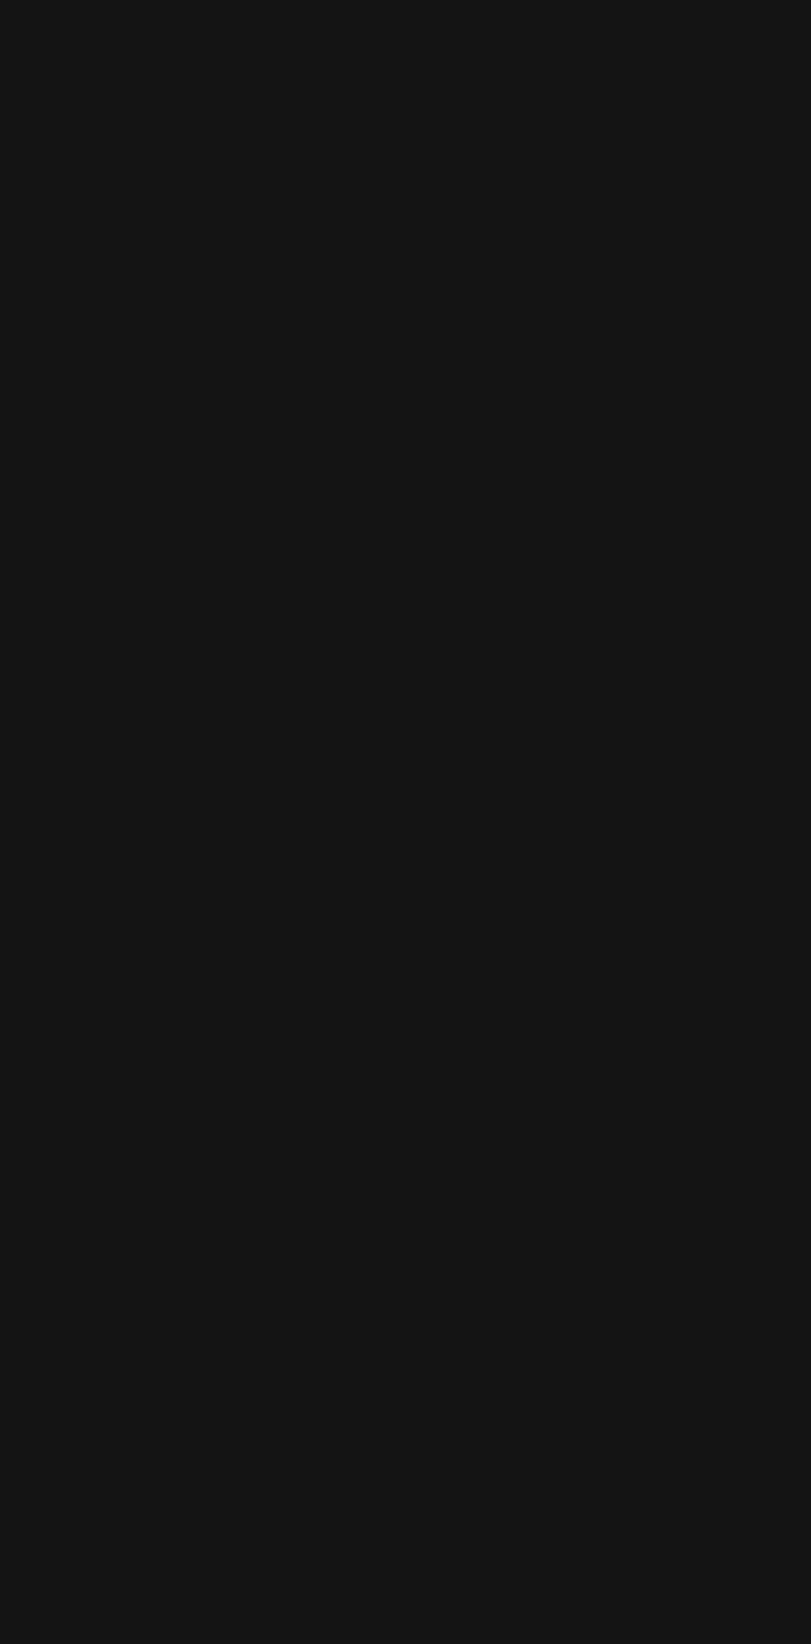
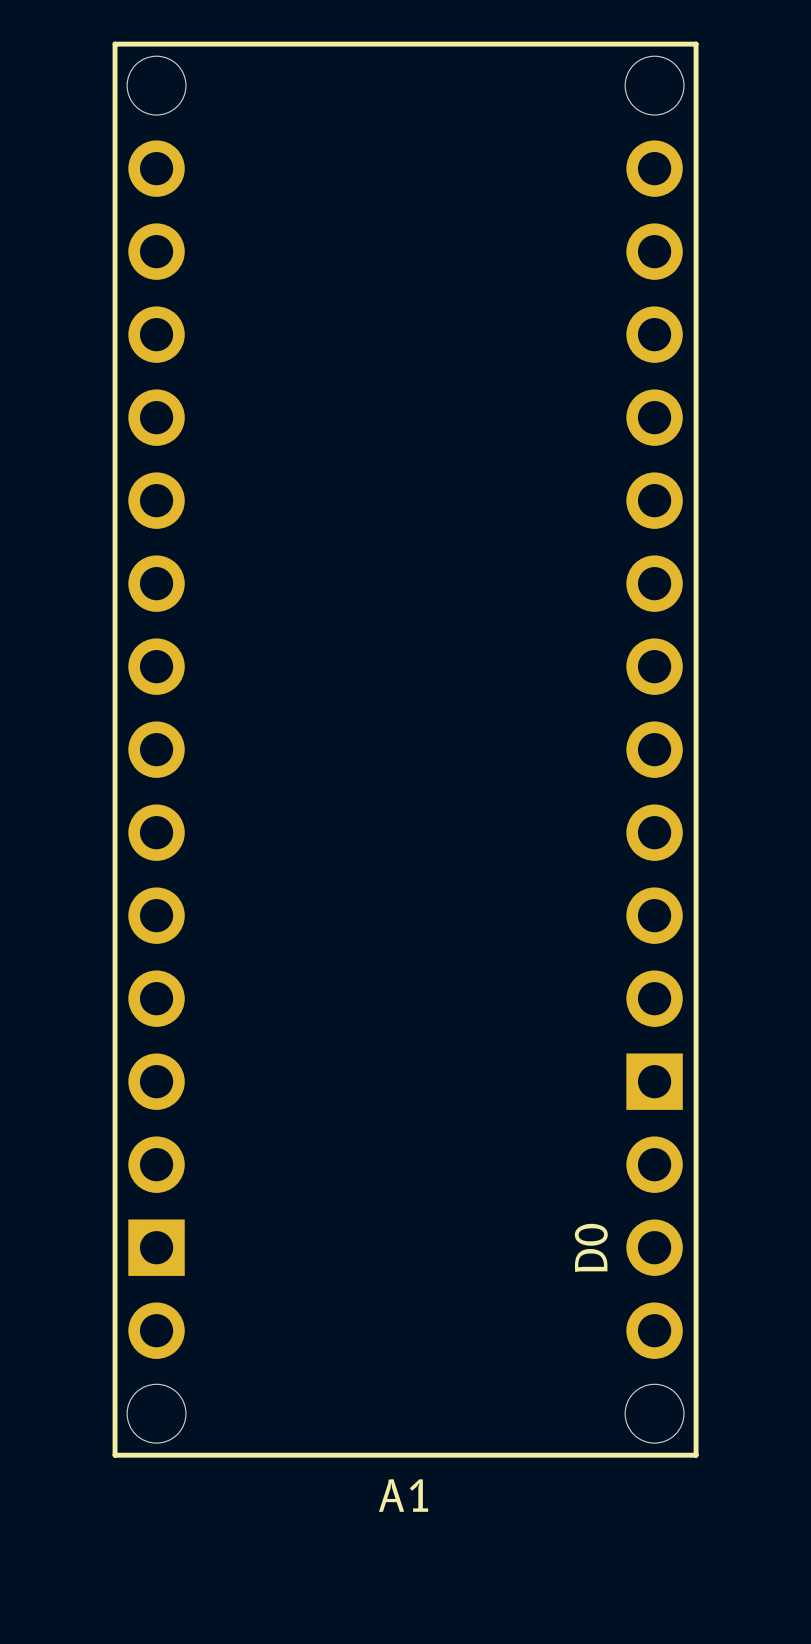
A1: none -> (405, 749)

